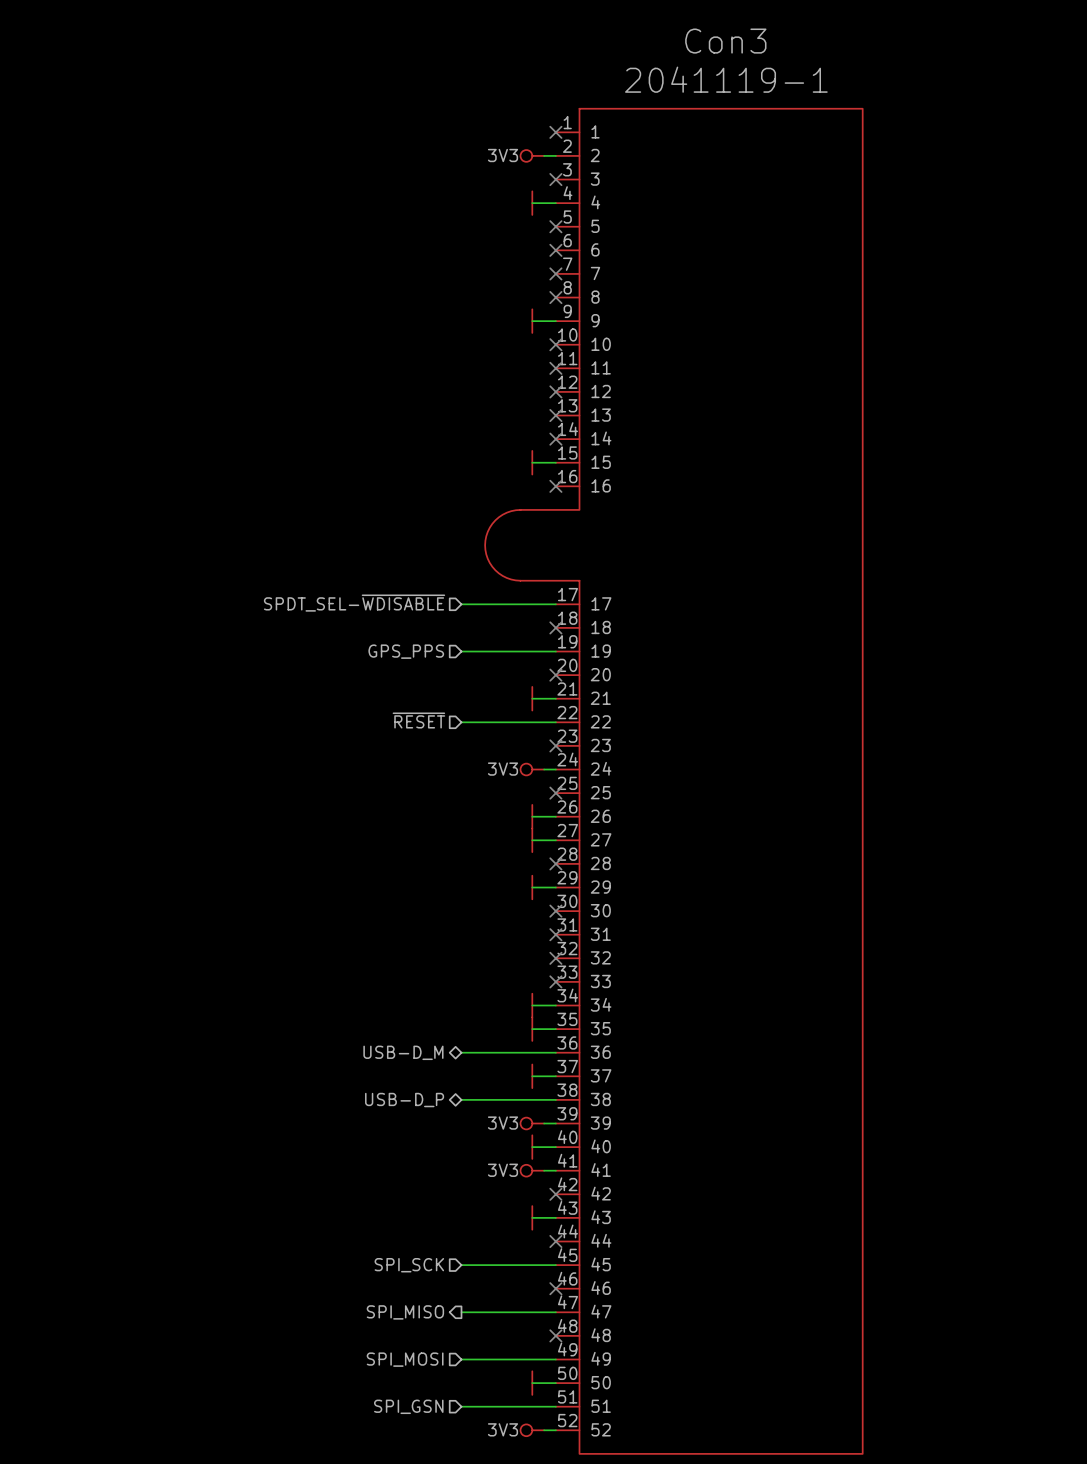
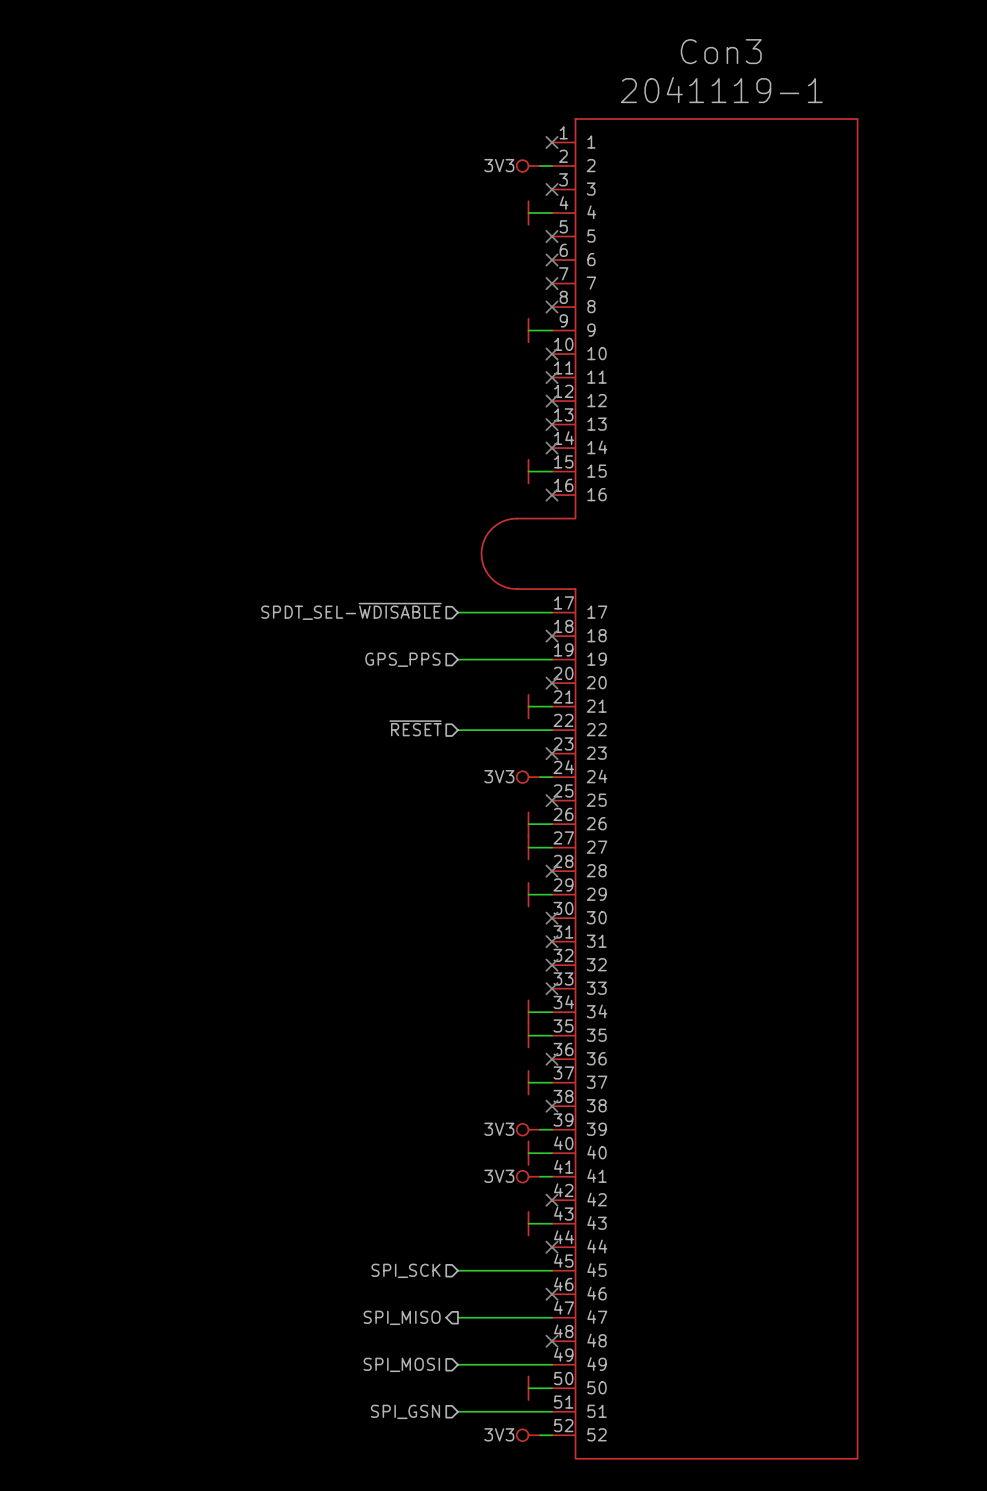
hierarchical label: USB-D_M (403, 1052) -> none
wire: (461, 1052) (555, 1052) -> none
no-connect mark: none -> (552, 1059)
wire: (461, 1099) (555, 1099) -> none
no-connect mark: none -> (552, 1106)
hierarchical label: USB-D_P (404, 1100) -> none

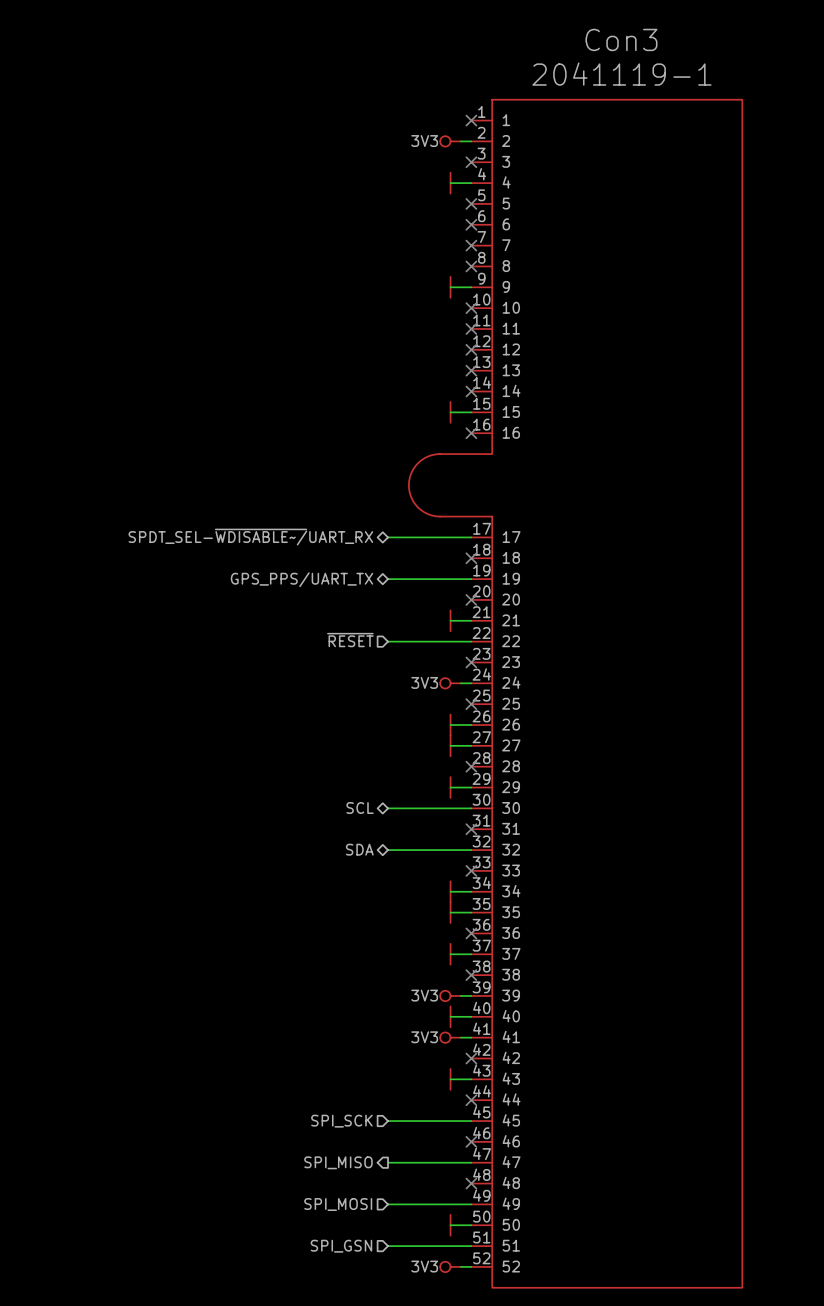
hierarchical label shape: input (351, 611) -> bidirectional (250, 537)
hierarchical label: SPDT_SEL-~{WDISABLE} (351, 611) -> SPDT_SEL-~{WDISABLE~/}UART_RX (250, 537)
hierarchical label shape: input (402, 659) -> bidirectional (301, 579)
hierarchical label: GPS_PPS (402, 659) -> GPS_PPS/UART_TX (301, 579)
hierarchical label: none -> SCL (360, 807)
wire: none -> (388, 808) (471, 808)
no-connect mark: (552, 918) -> none
hierarchical label: none -> SDA (359, 849)
wire: none -> (388, 850) (471, 850)
no-connect mark: (552, 965) -> none

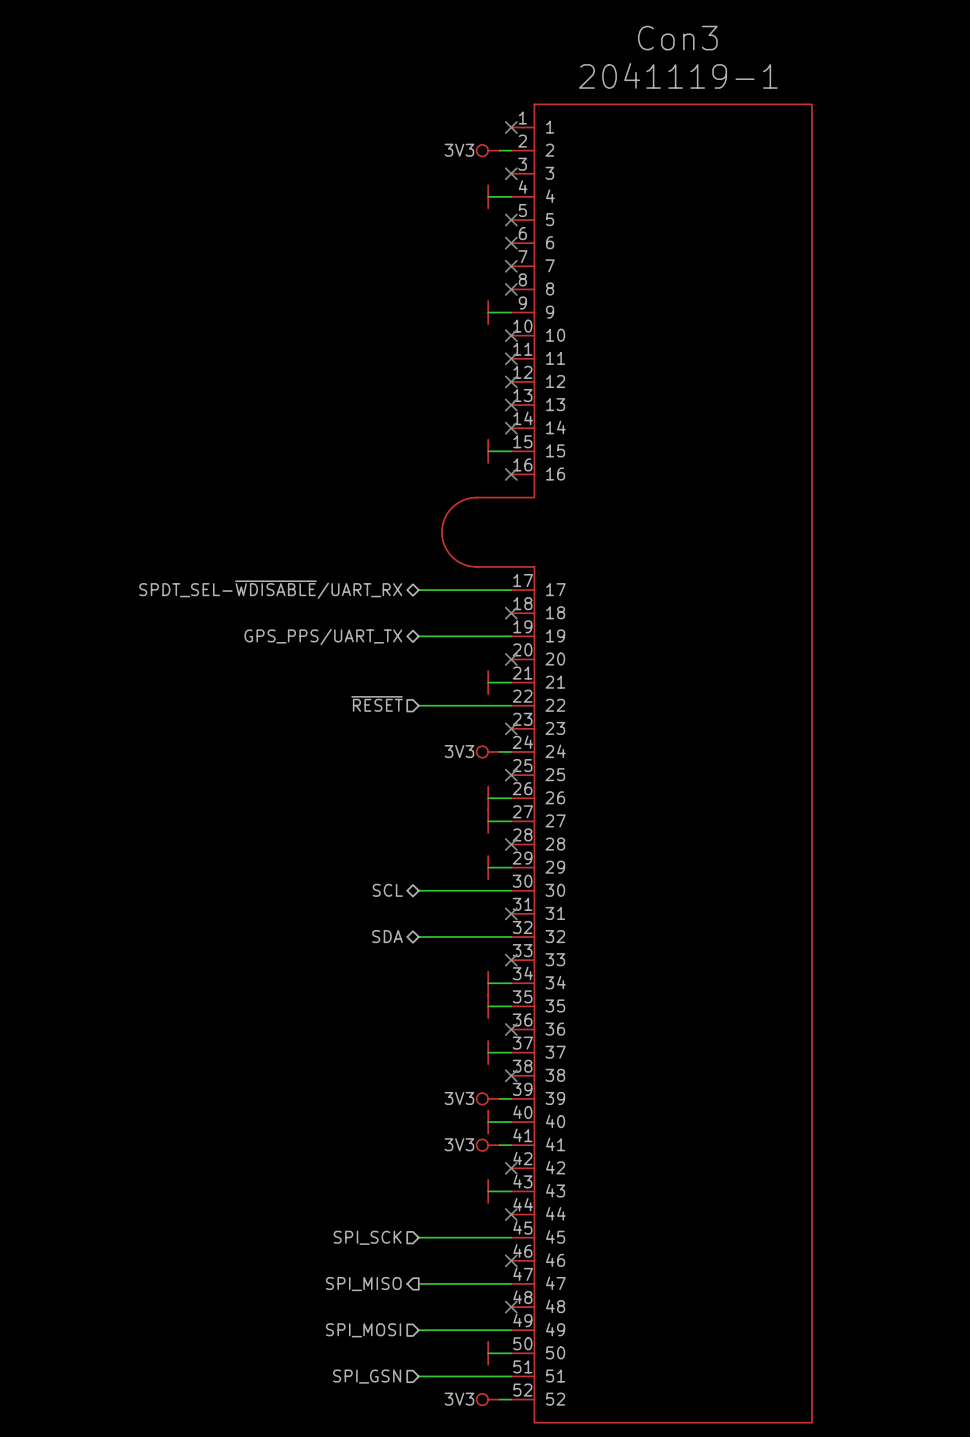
hierarchical label: SPDT_SEL-~{WDISABLE~/}UART_RX (250, 537) -> SPDT_SEL-~{WDISABLE}/UART_RX (270, 589)

